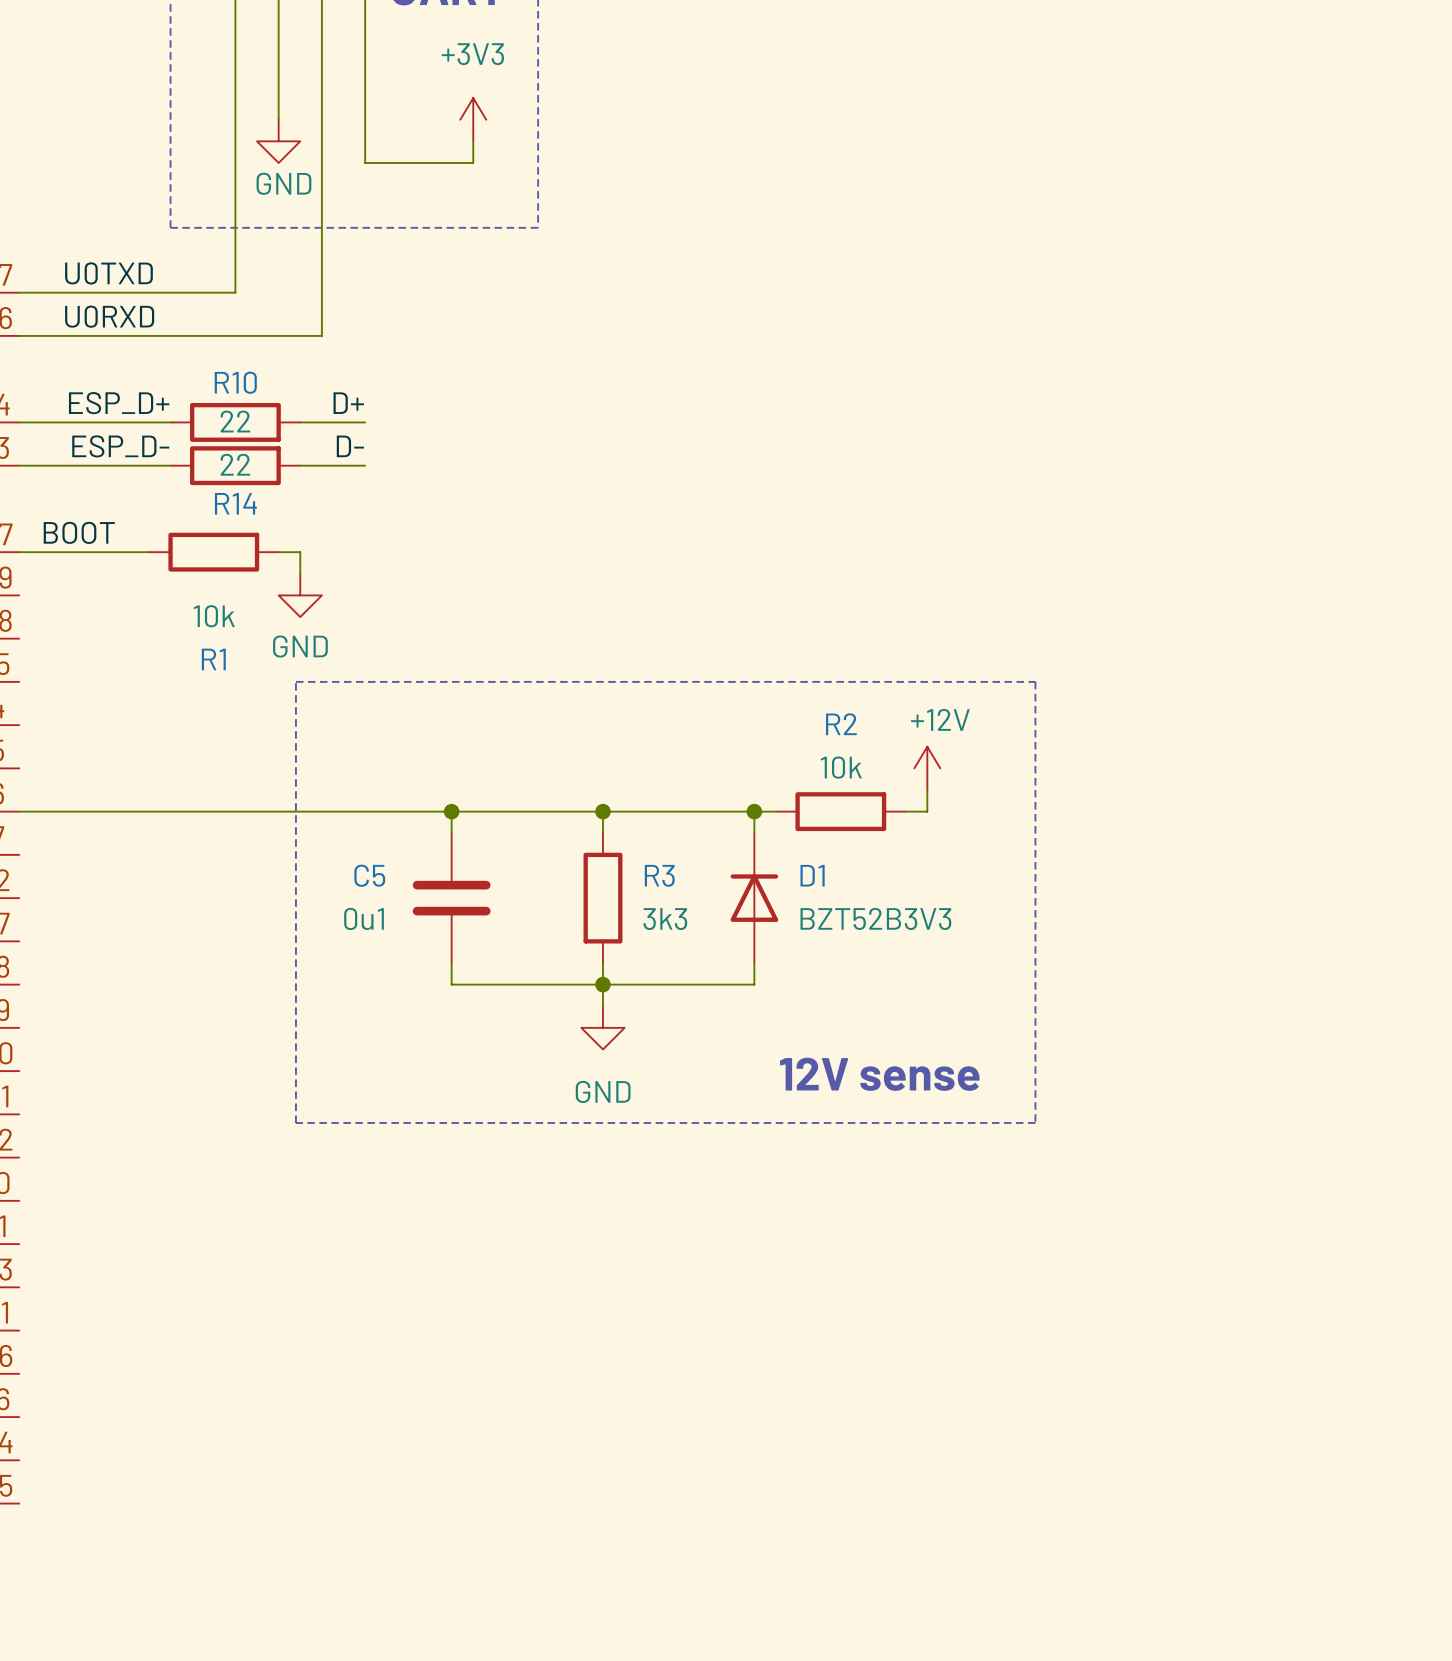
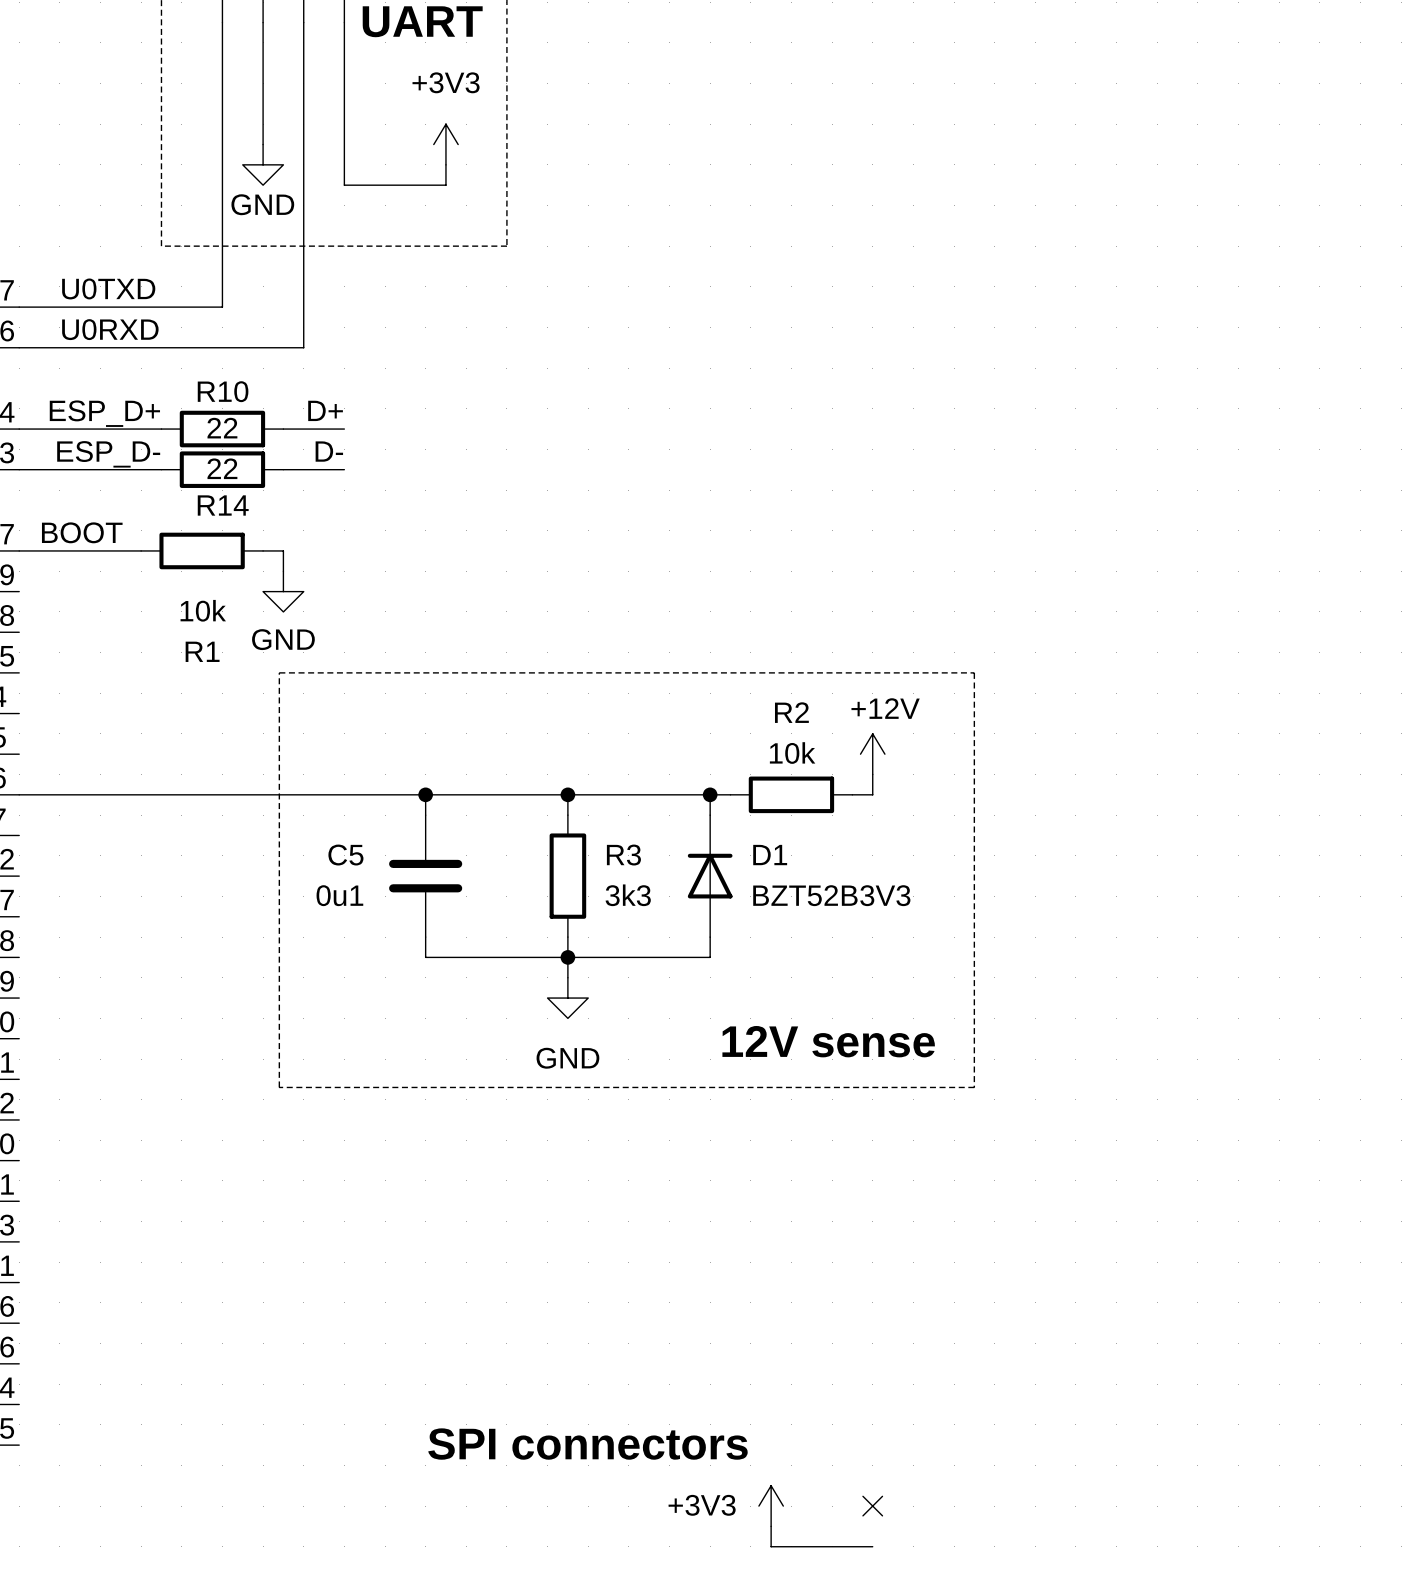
text: none -> SPI connectors (587, 1444)
power symbol: none -> +3V3 (771, 1506)
no-connect mark: none -> (872, 1506)
wire: none -> (771, 1526) (771, 1546) (872, 1546)

